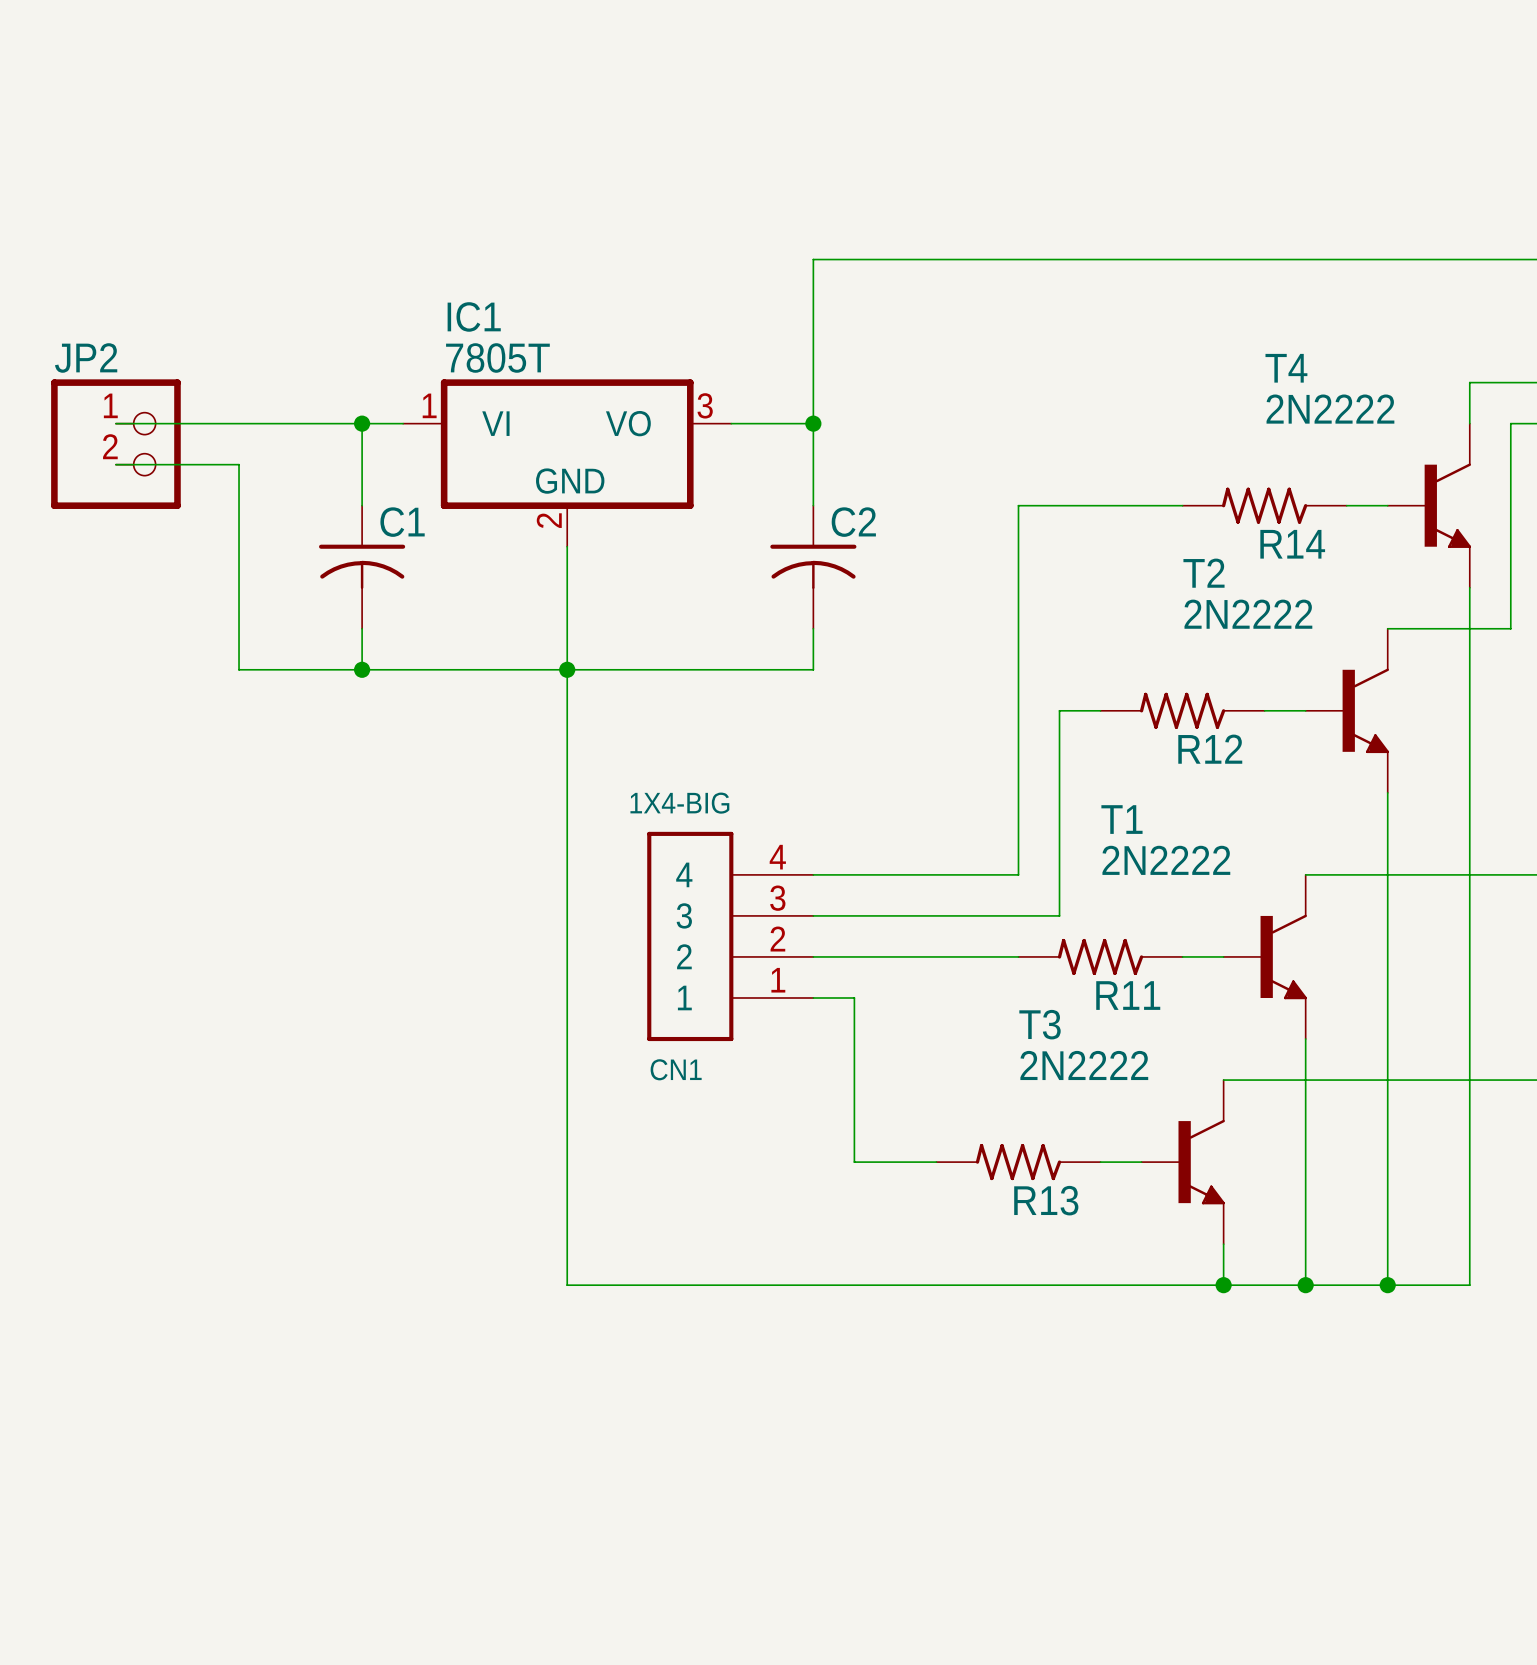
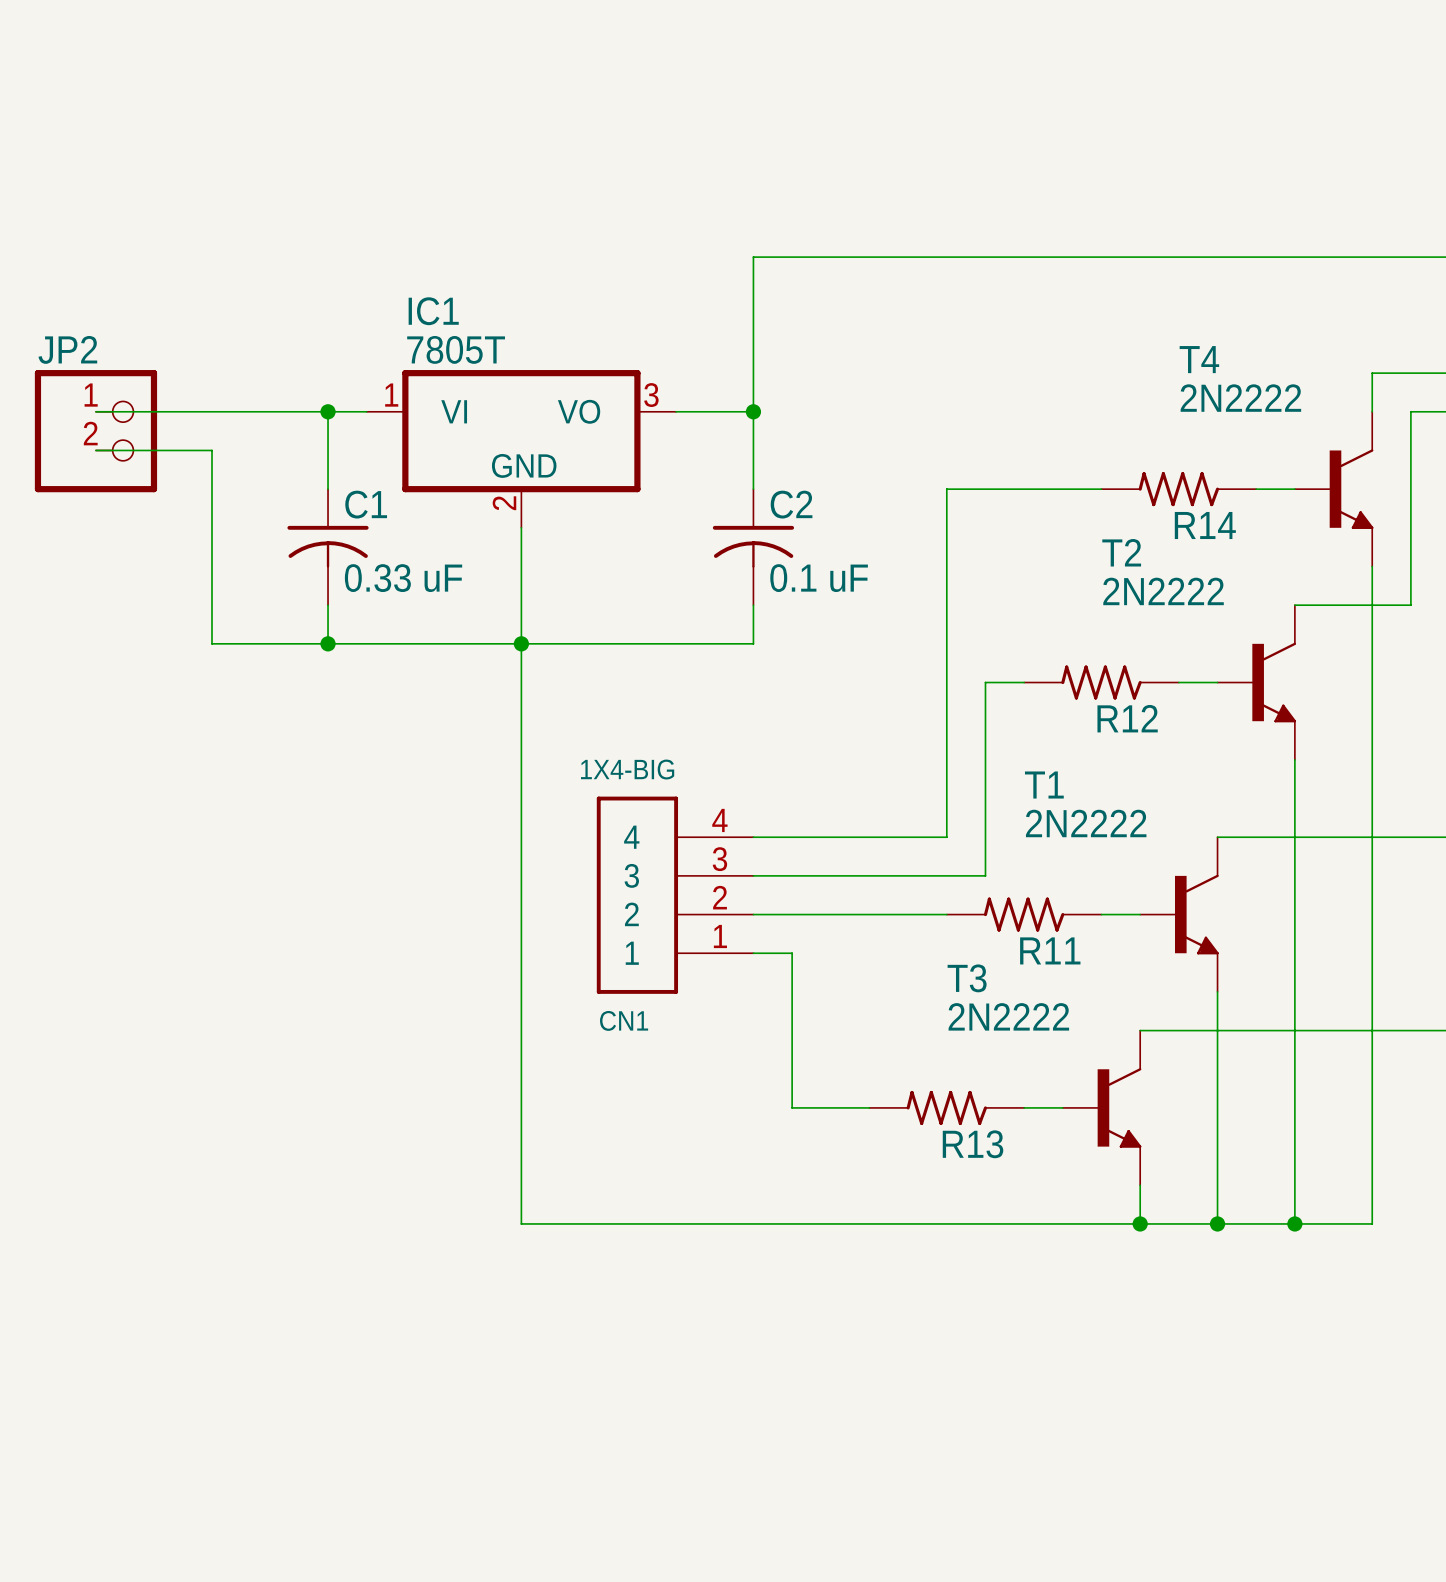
C1 value: none -> 0.33 uF (403, 578)
C2 value: none -> 0.1 uF (819, 578)

